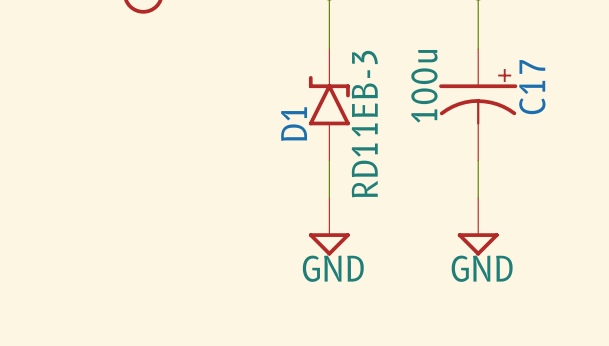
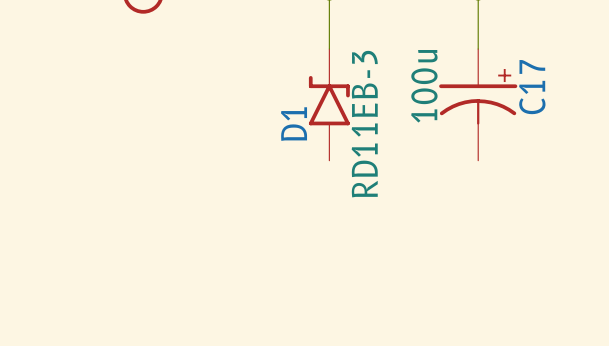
wire: (329, 160) (329, 197) -> none
wire: (478, 160) (478, 197) -> none
power symbol: GND (329, 226) -> none
power symbol: GND (478, 226) -> none

